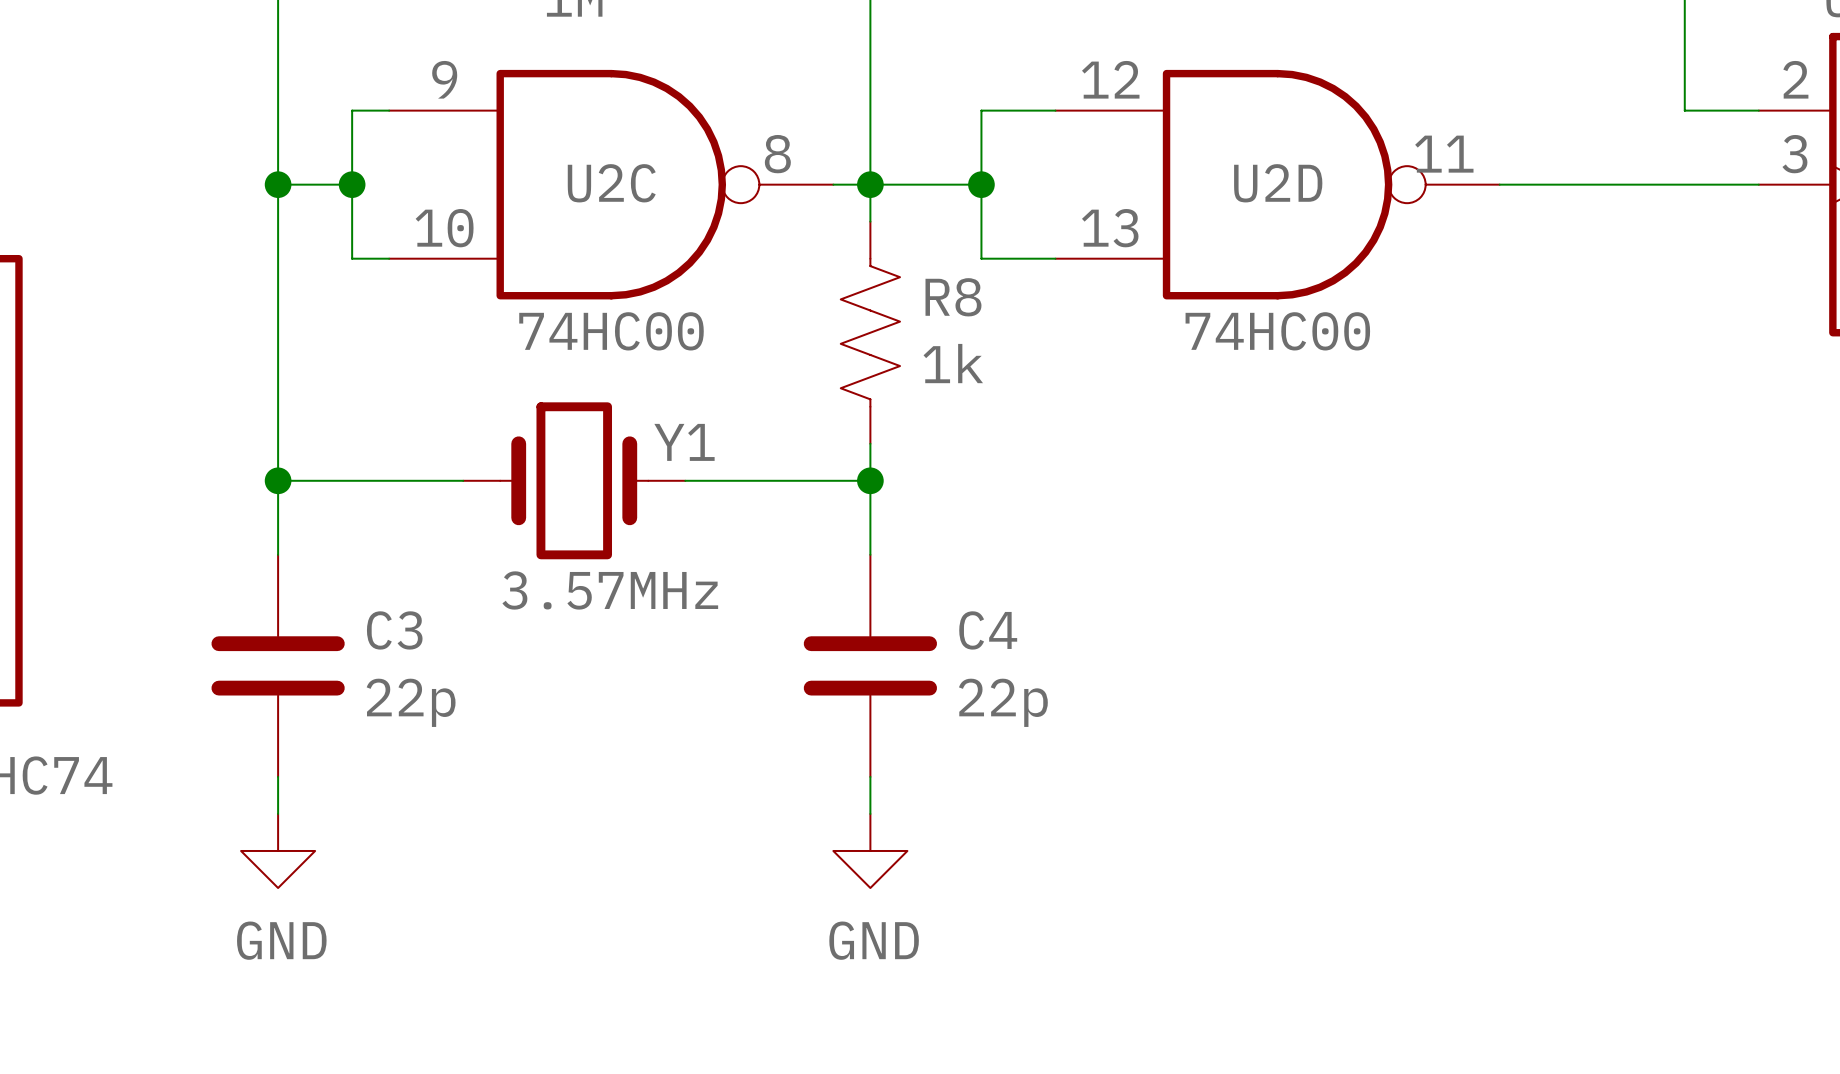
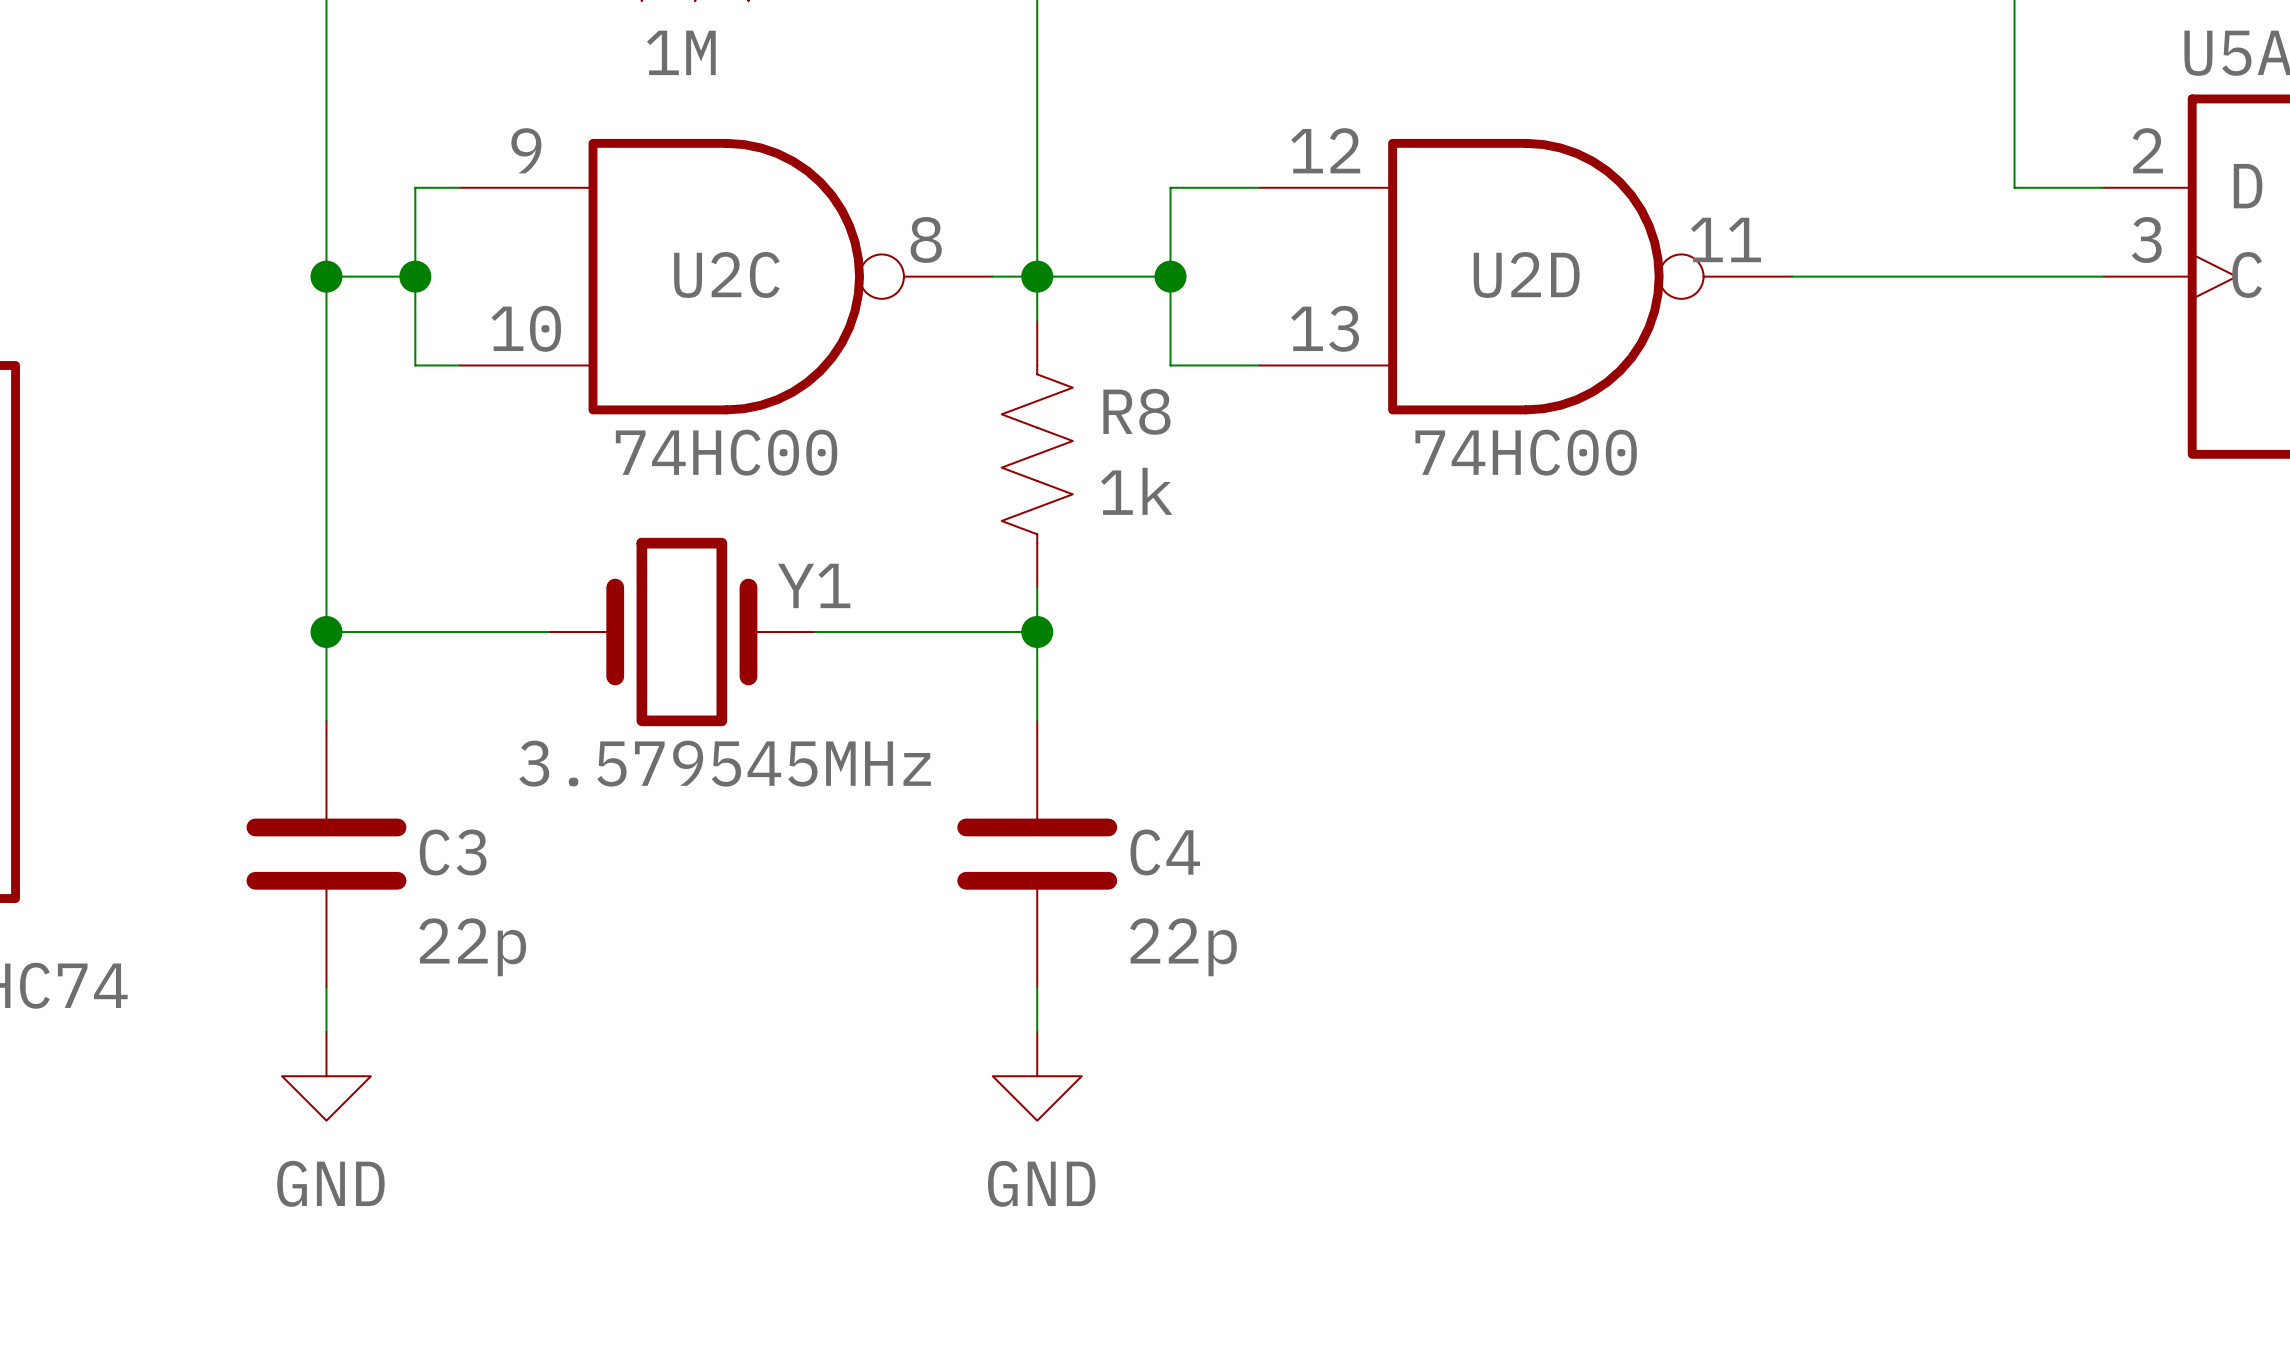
Y1 value: 3.57MHz (610, 590) -> 3.579545MHz (725, 763)
C3 name position: C3 (394, 630) -> C3 (453, 852)
C4 name position: C4 (988, 630) -> C4 (1165, 852)
C3 value position: 22p (411, 702) -> 22p (472, 947)
C4 value position: 22p (1003, 702) -> 22p (1183, 947)

